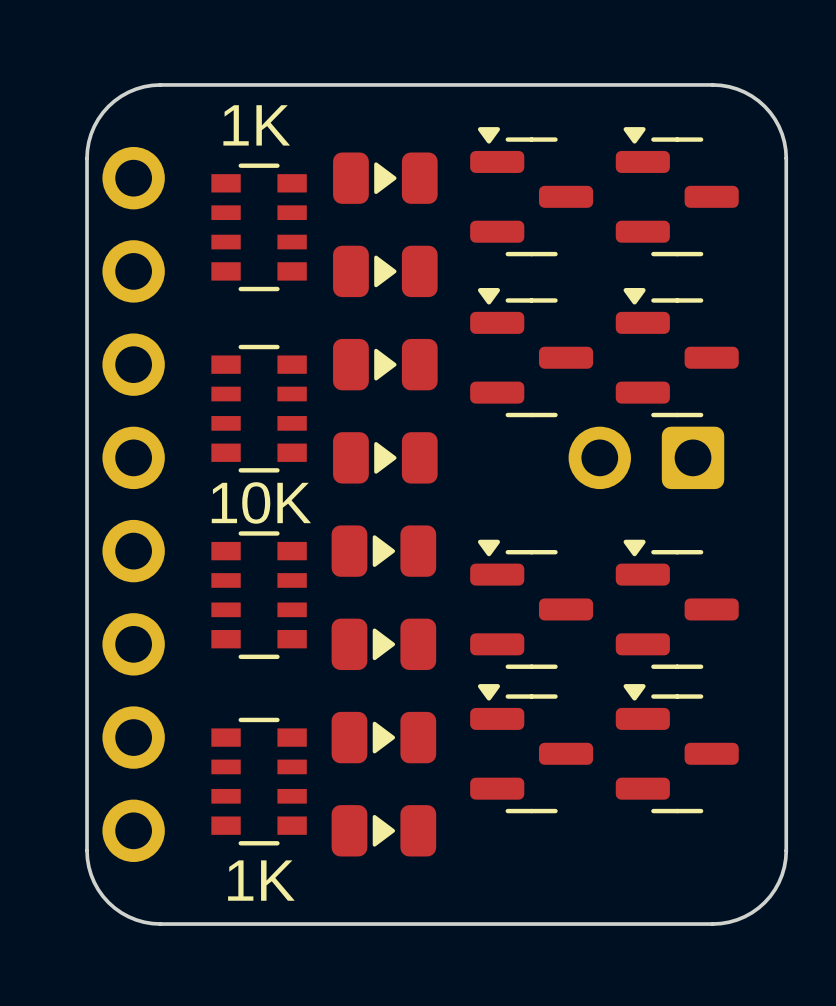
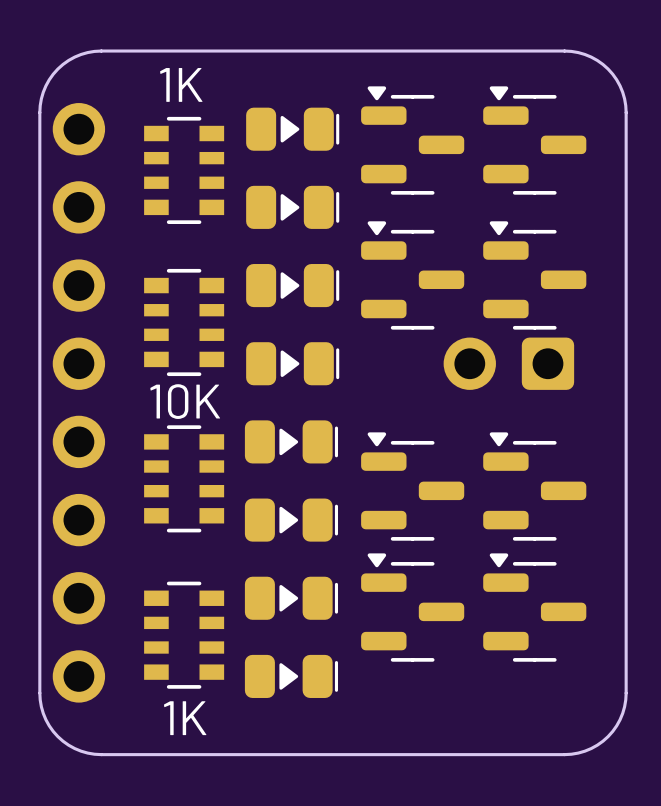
part footprint: [333, 152, 438, 204] -> [246, 107, 340, 151]
part footprint: [333, 245, 438, 298] -> [246, 185, 340, 229]
part footprint: [333, 338, 438, 391] -> [246, 264, 340, 308]
part footprint: [333, 432, 438, 484] -> [246, 342, 340, 386]
part footprint: [331, 525, 437, 577] -> [244, 420, 339, 464]
part footprint: [331, 618, 437, 671] -> [244, 498, 339, 542]
part footprint: [331, 711, 437, 764] -> [244, 576, 339, 620]
part footprint: [331, 805, 437, 857] -> [244, 654, 339, 698]

